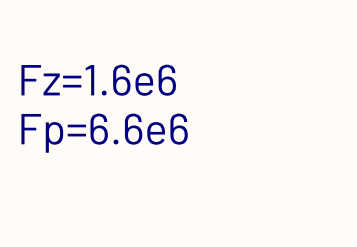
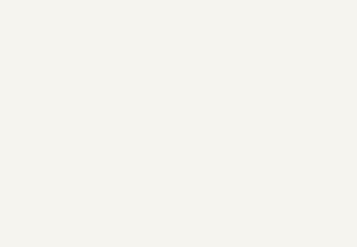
text: Fz=1.6e6 (98, 80) -> none
text: Fp=6.6e6 (104, 133) -> none

